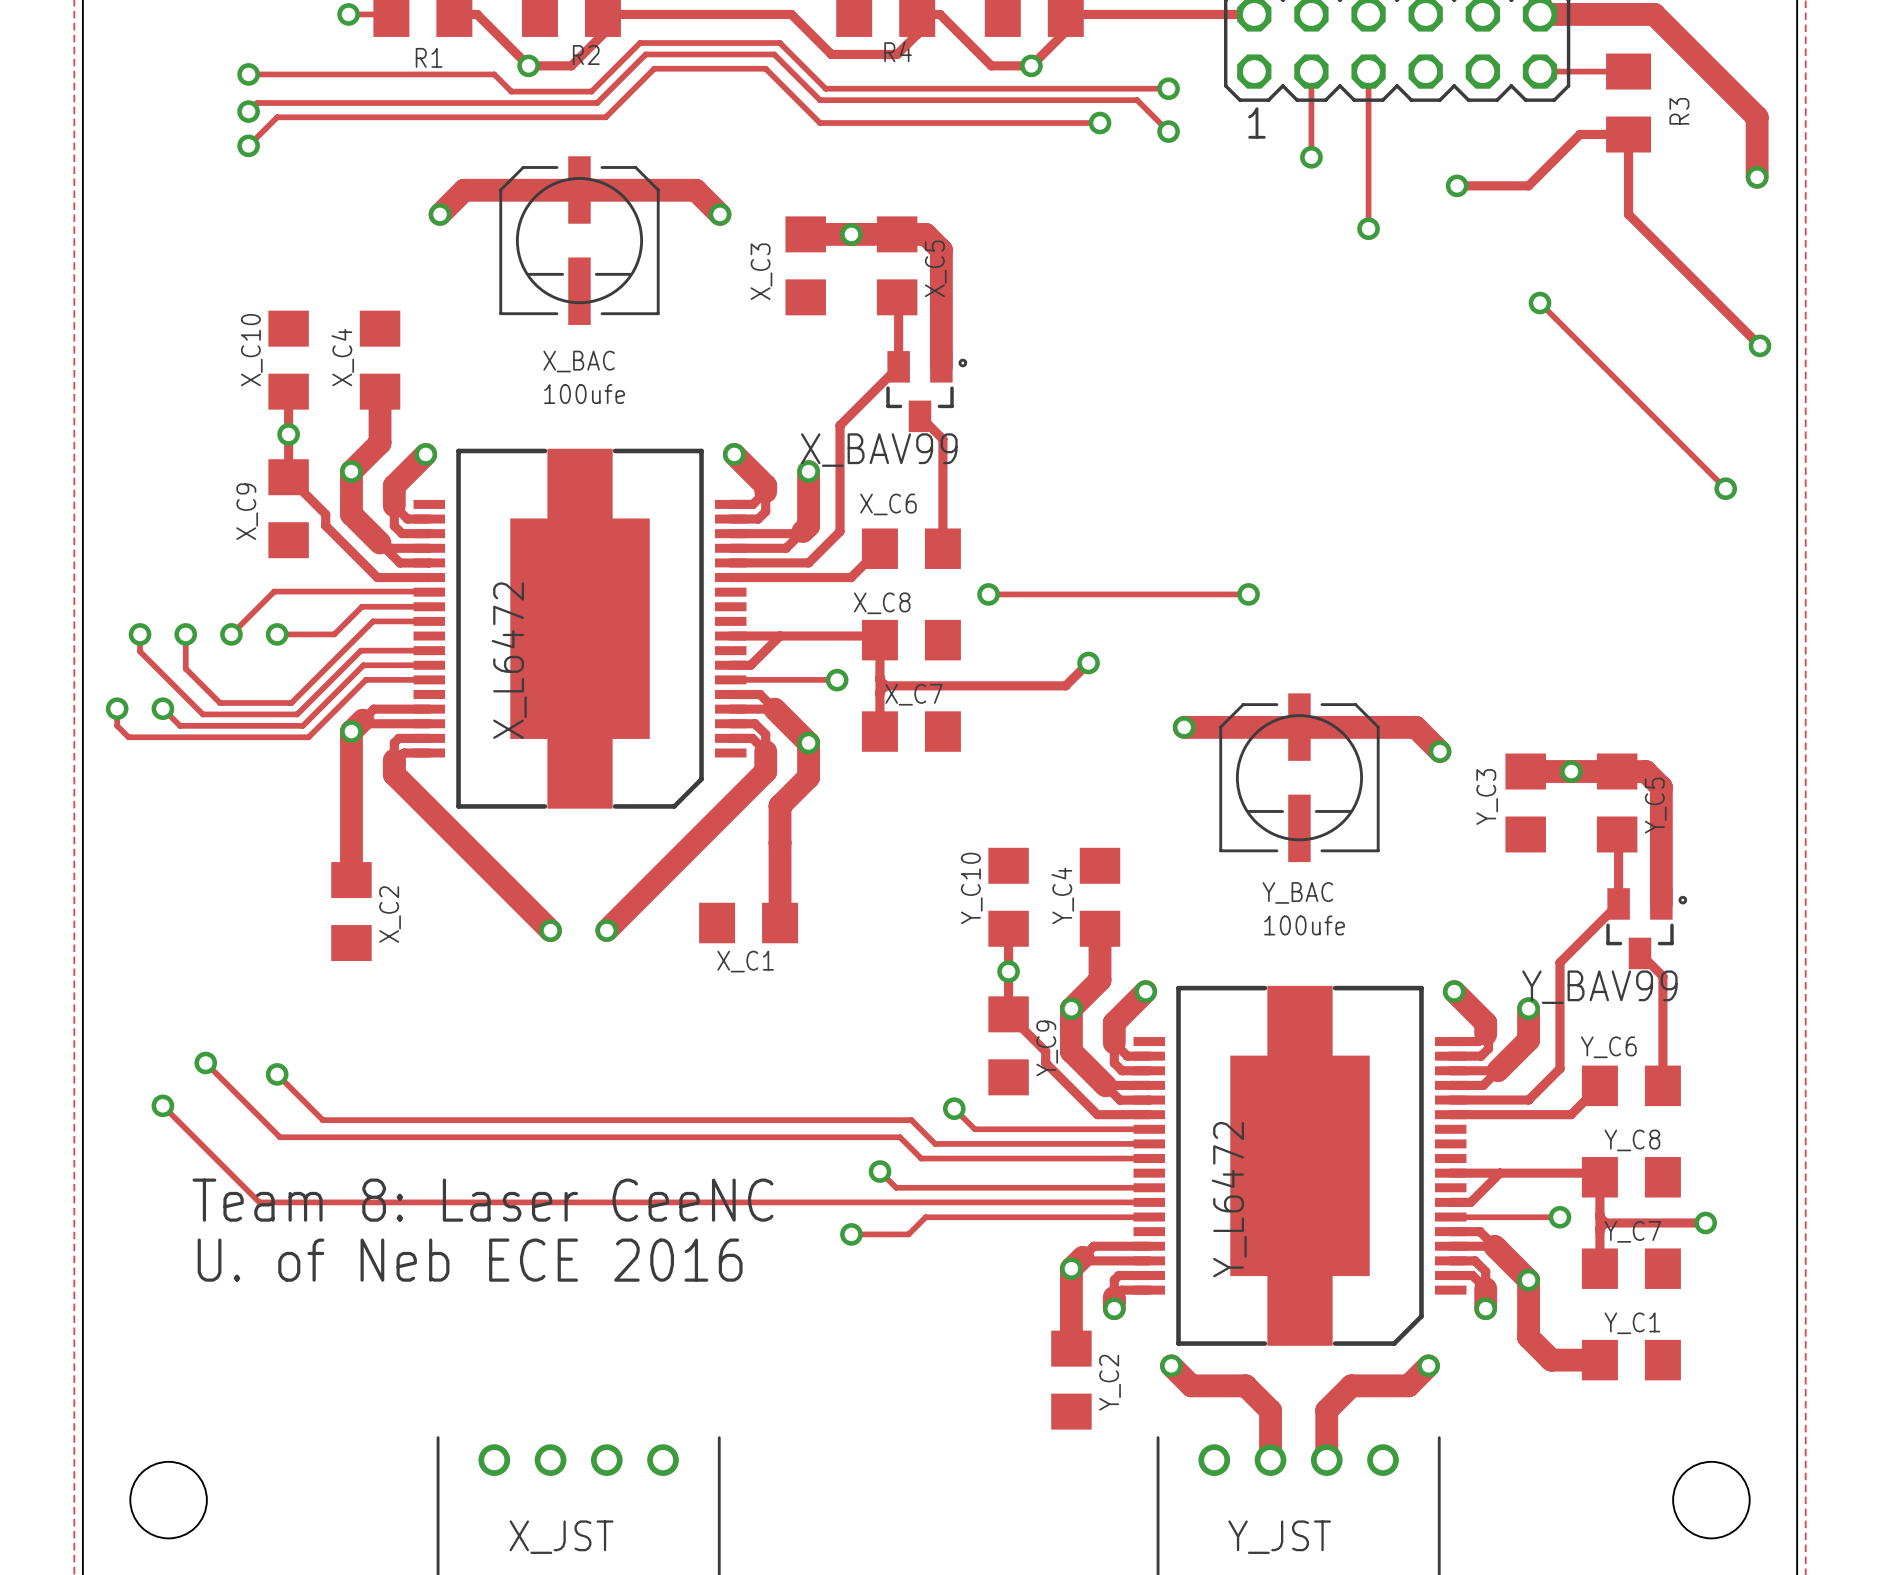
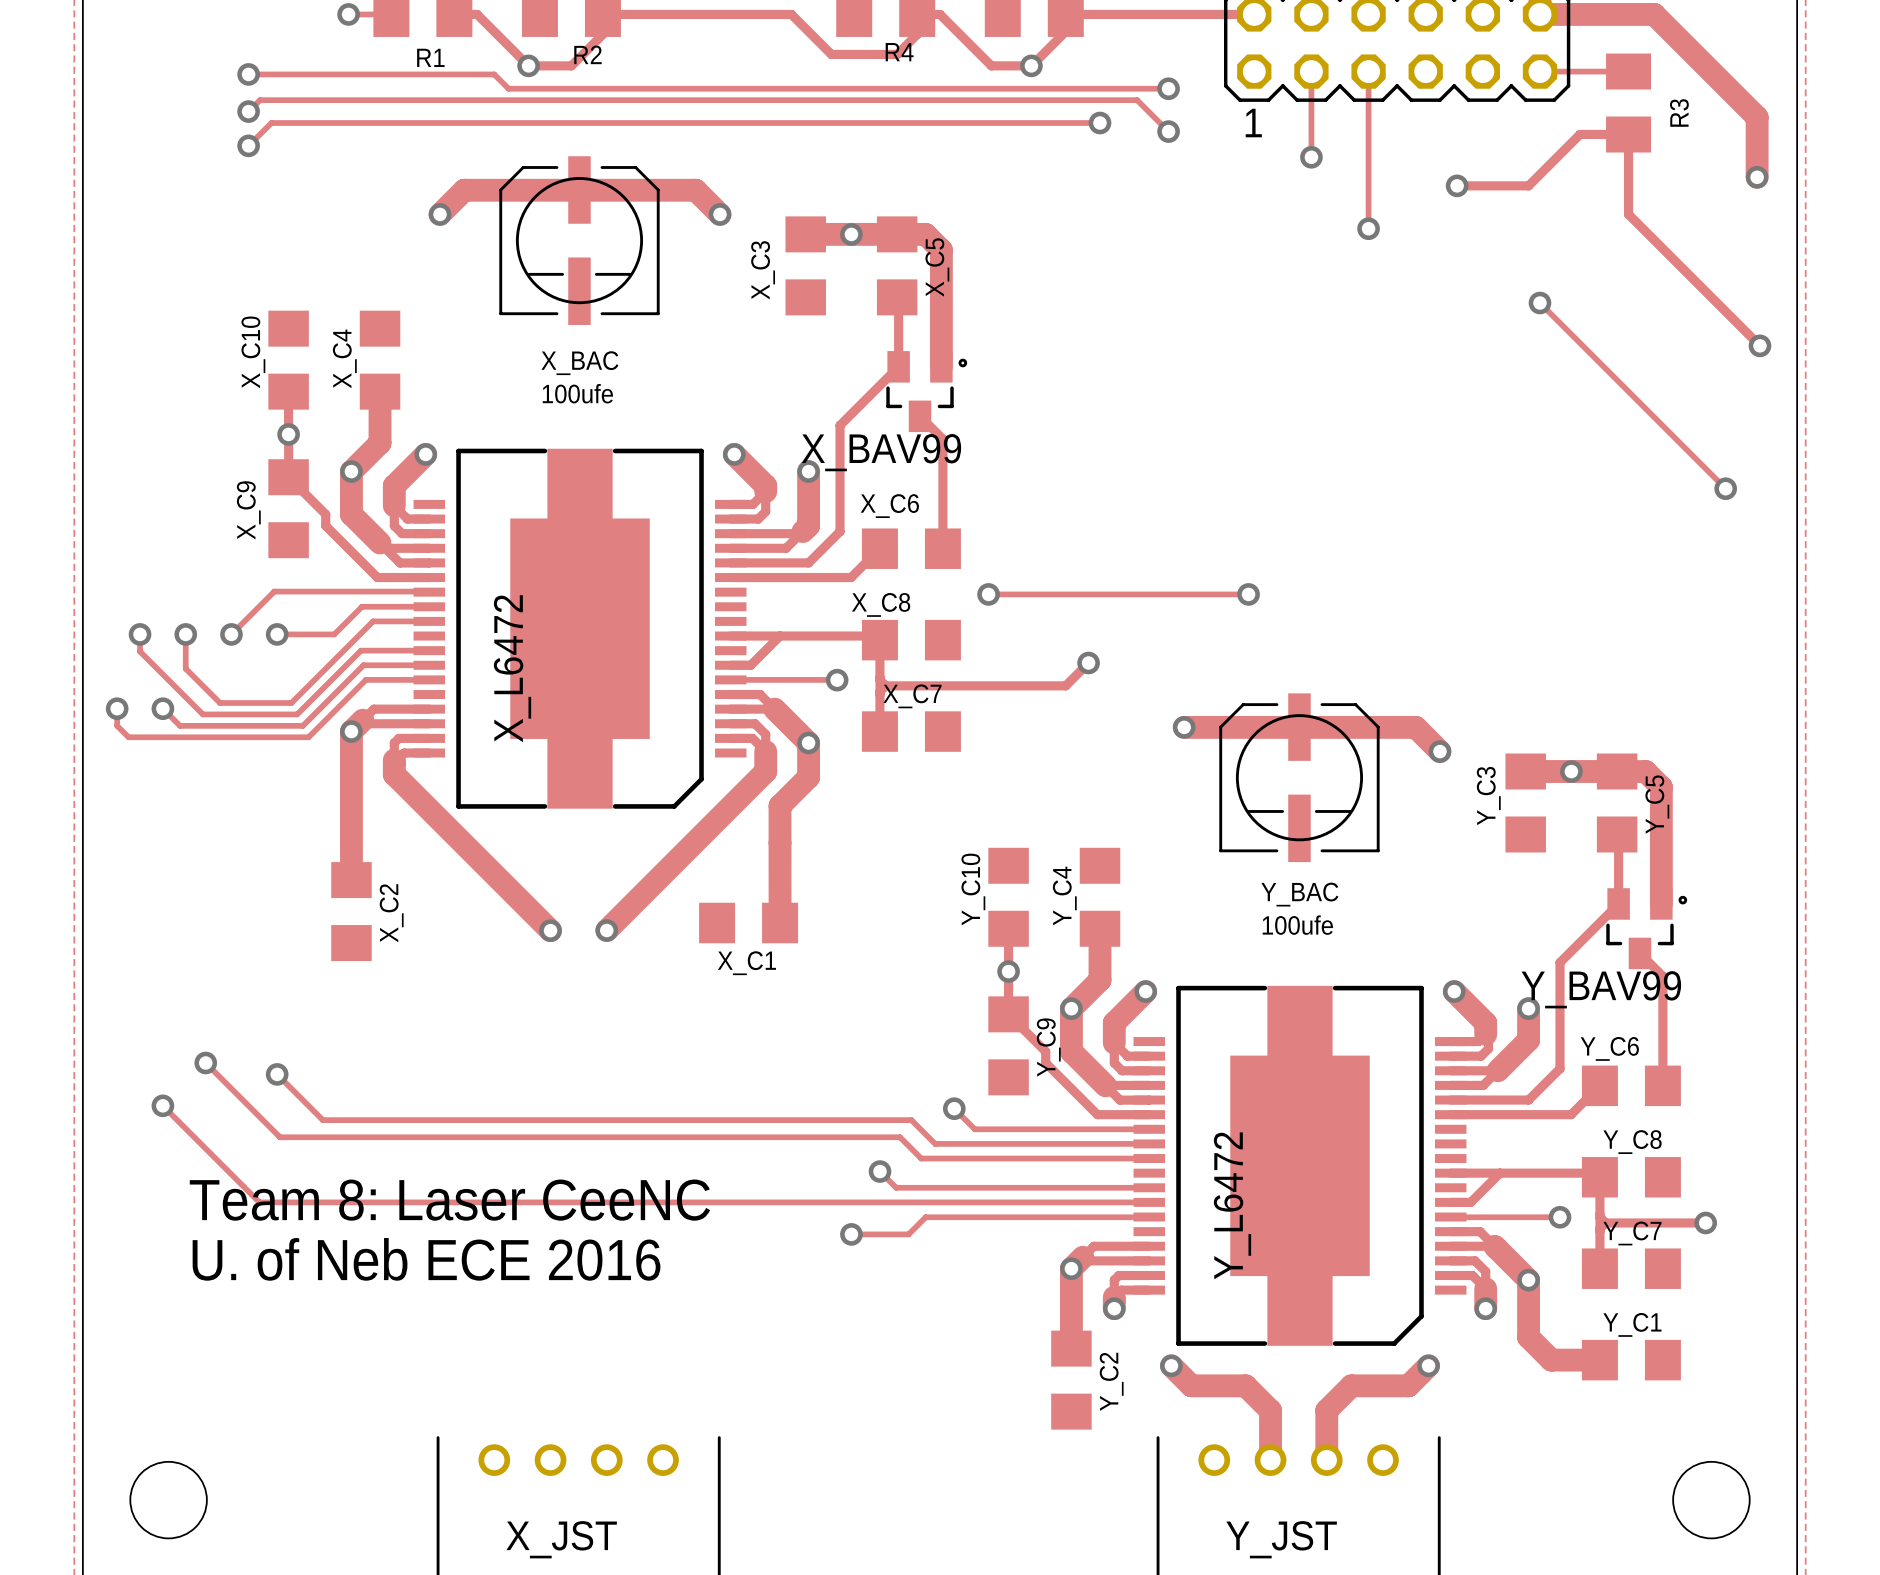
track: (508, 88) (511, 91) (591, 91) (640, 43) (780, 43) (825, 88) -> (508, 88) (825, 88)
track: (820, 100) (774, 54) (645, 54) (597, 103) (257, 103) -> (820, 100) (260, 100) (257, 103)
track: (271, 123) (277, 117) (605, 117) (654, 68) (765, 68) (820, 123) -> (271, 123) (820, 123)

